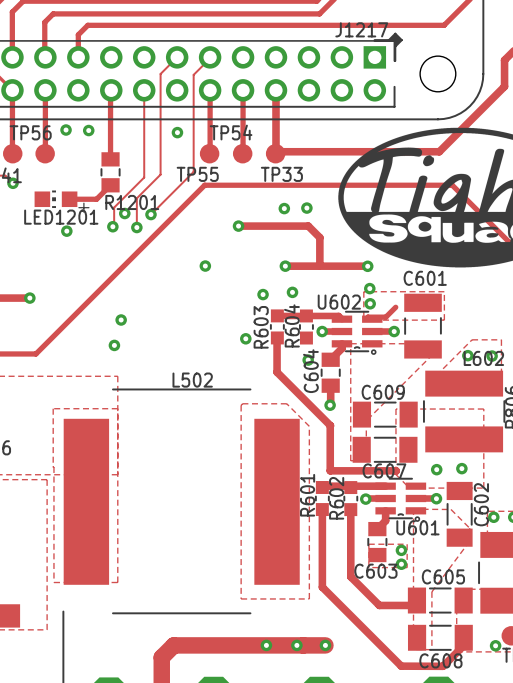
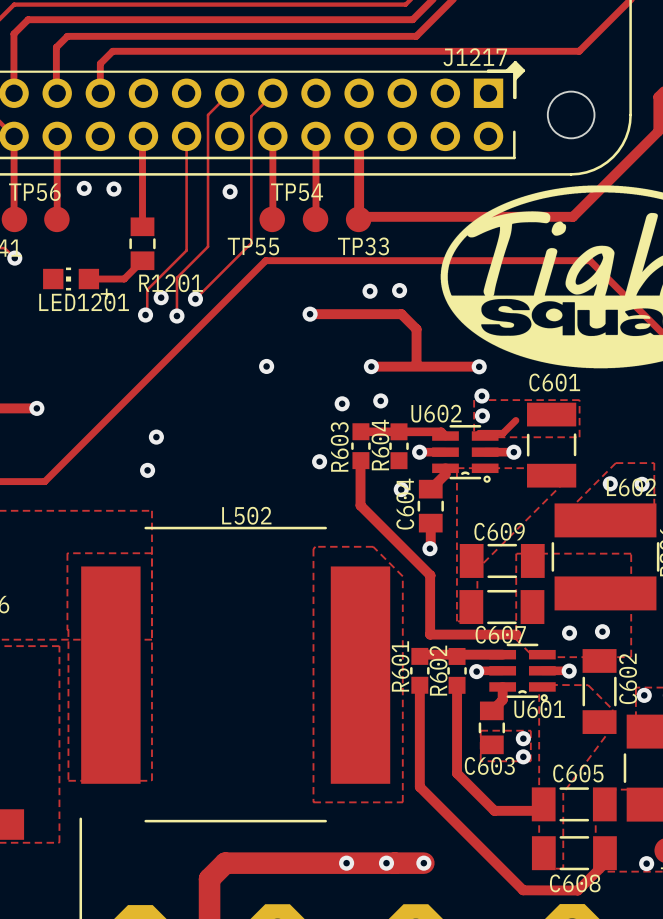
via: (66, 231) -> none

